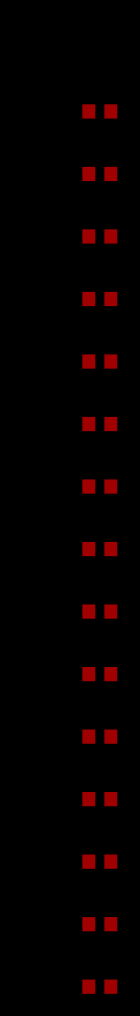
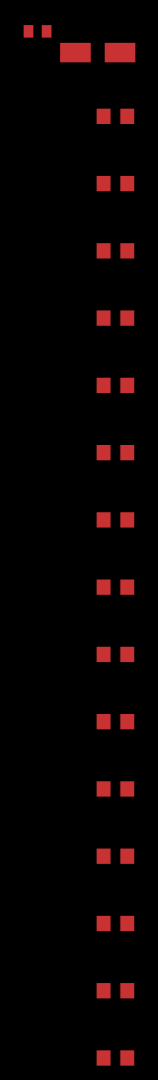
part: none -> (37, 31)
part: none -> (97, 52)

